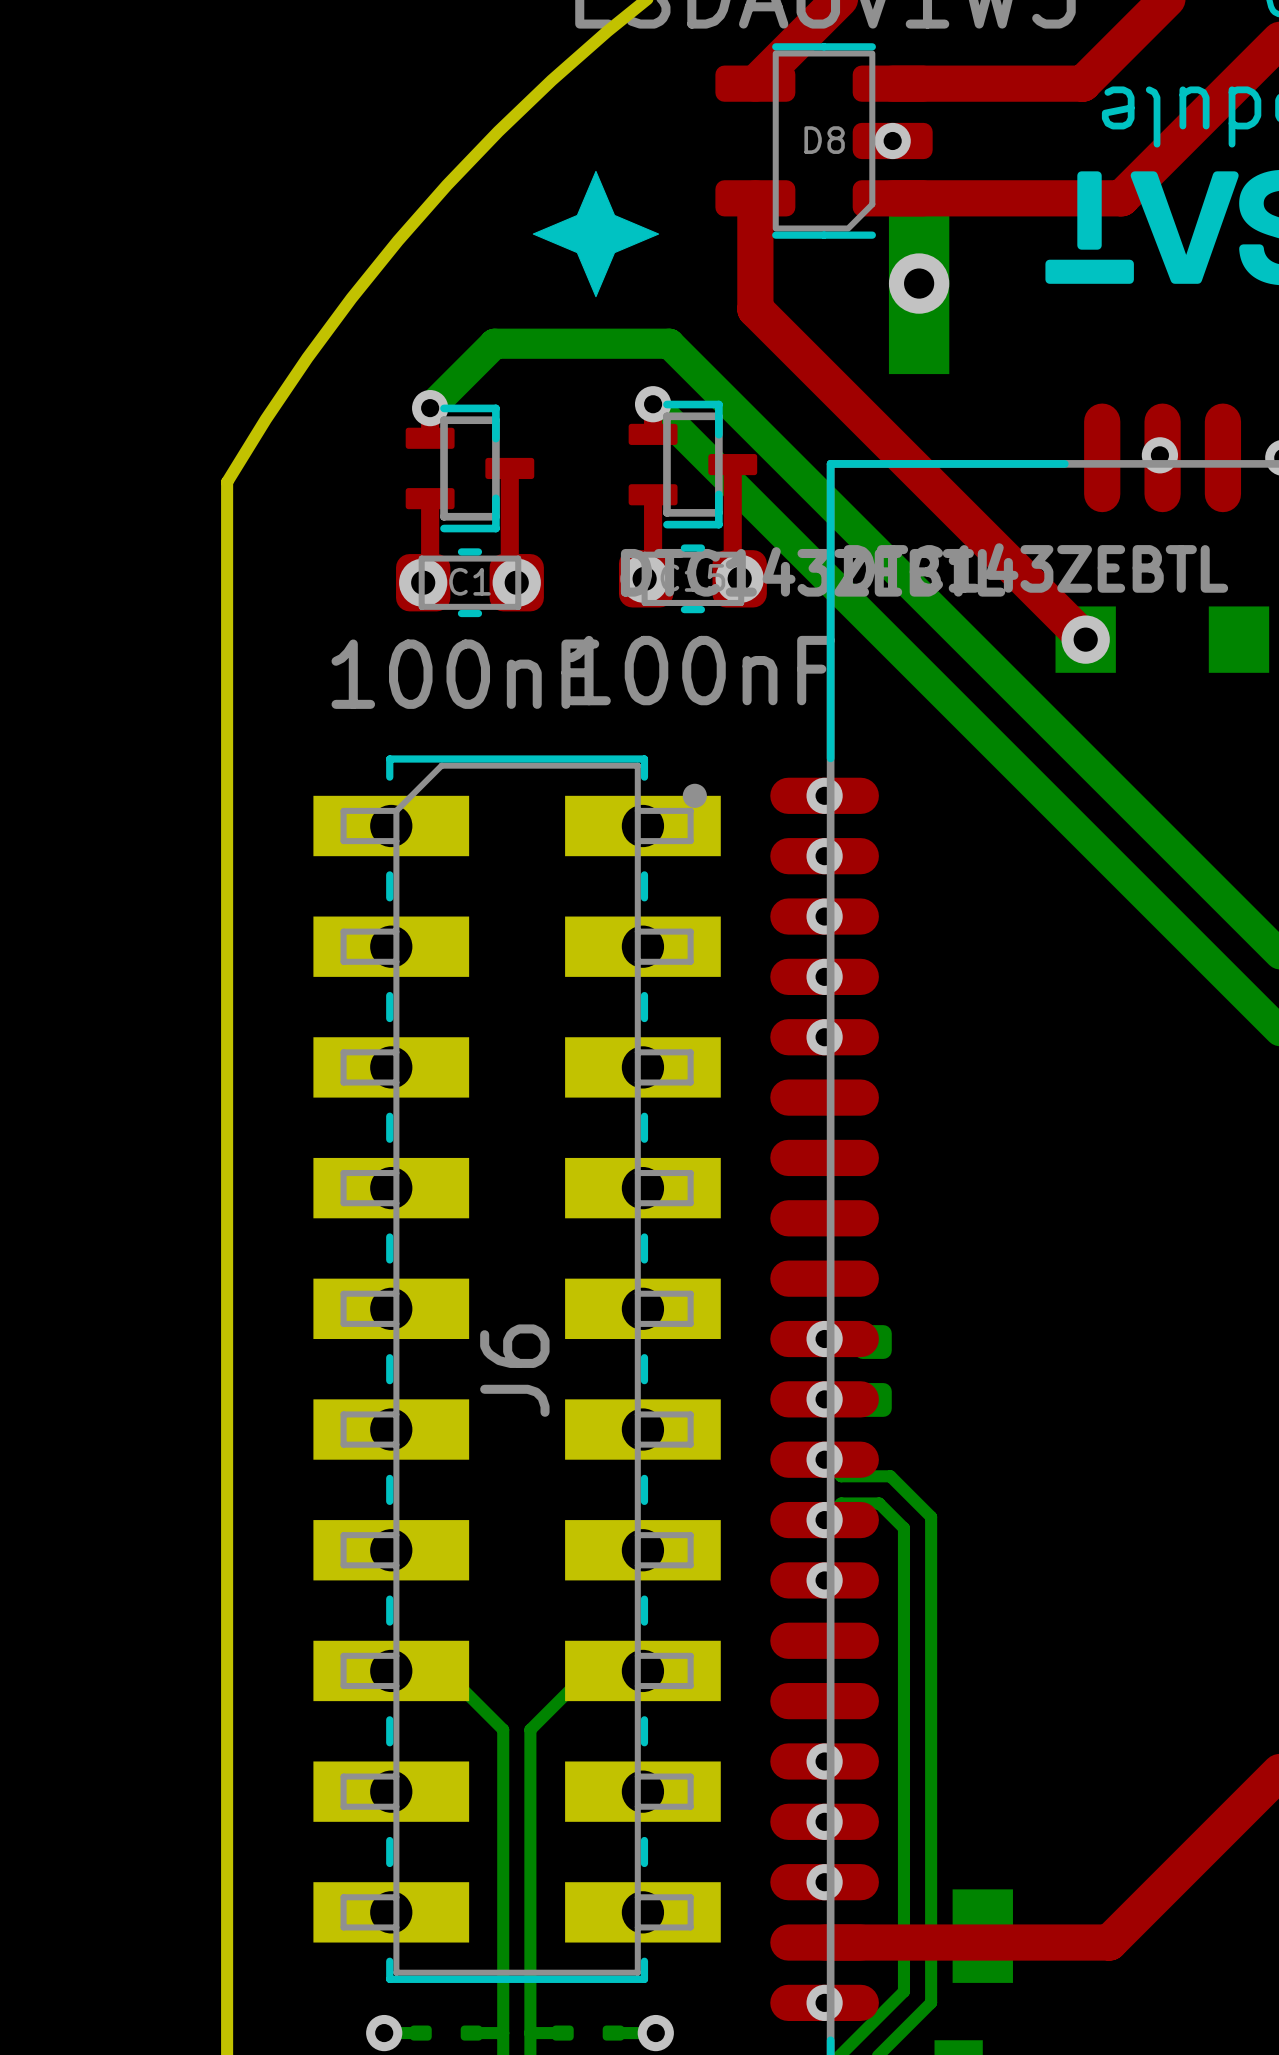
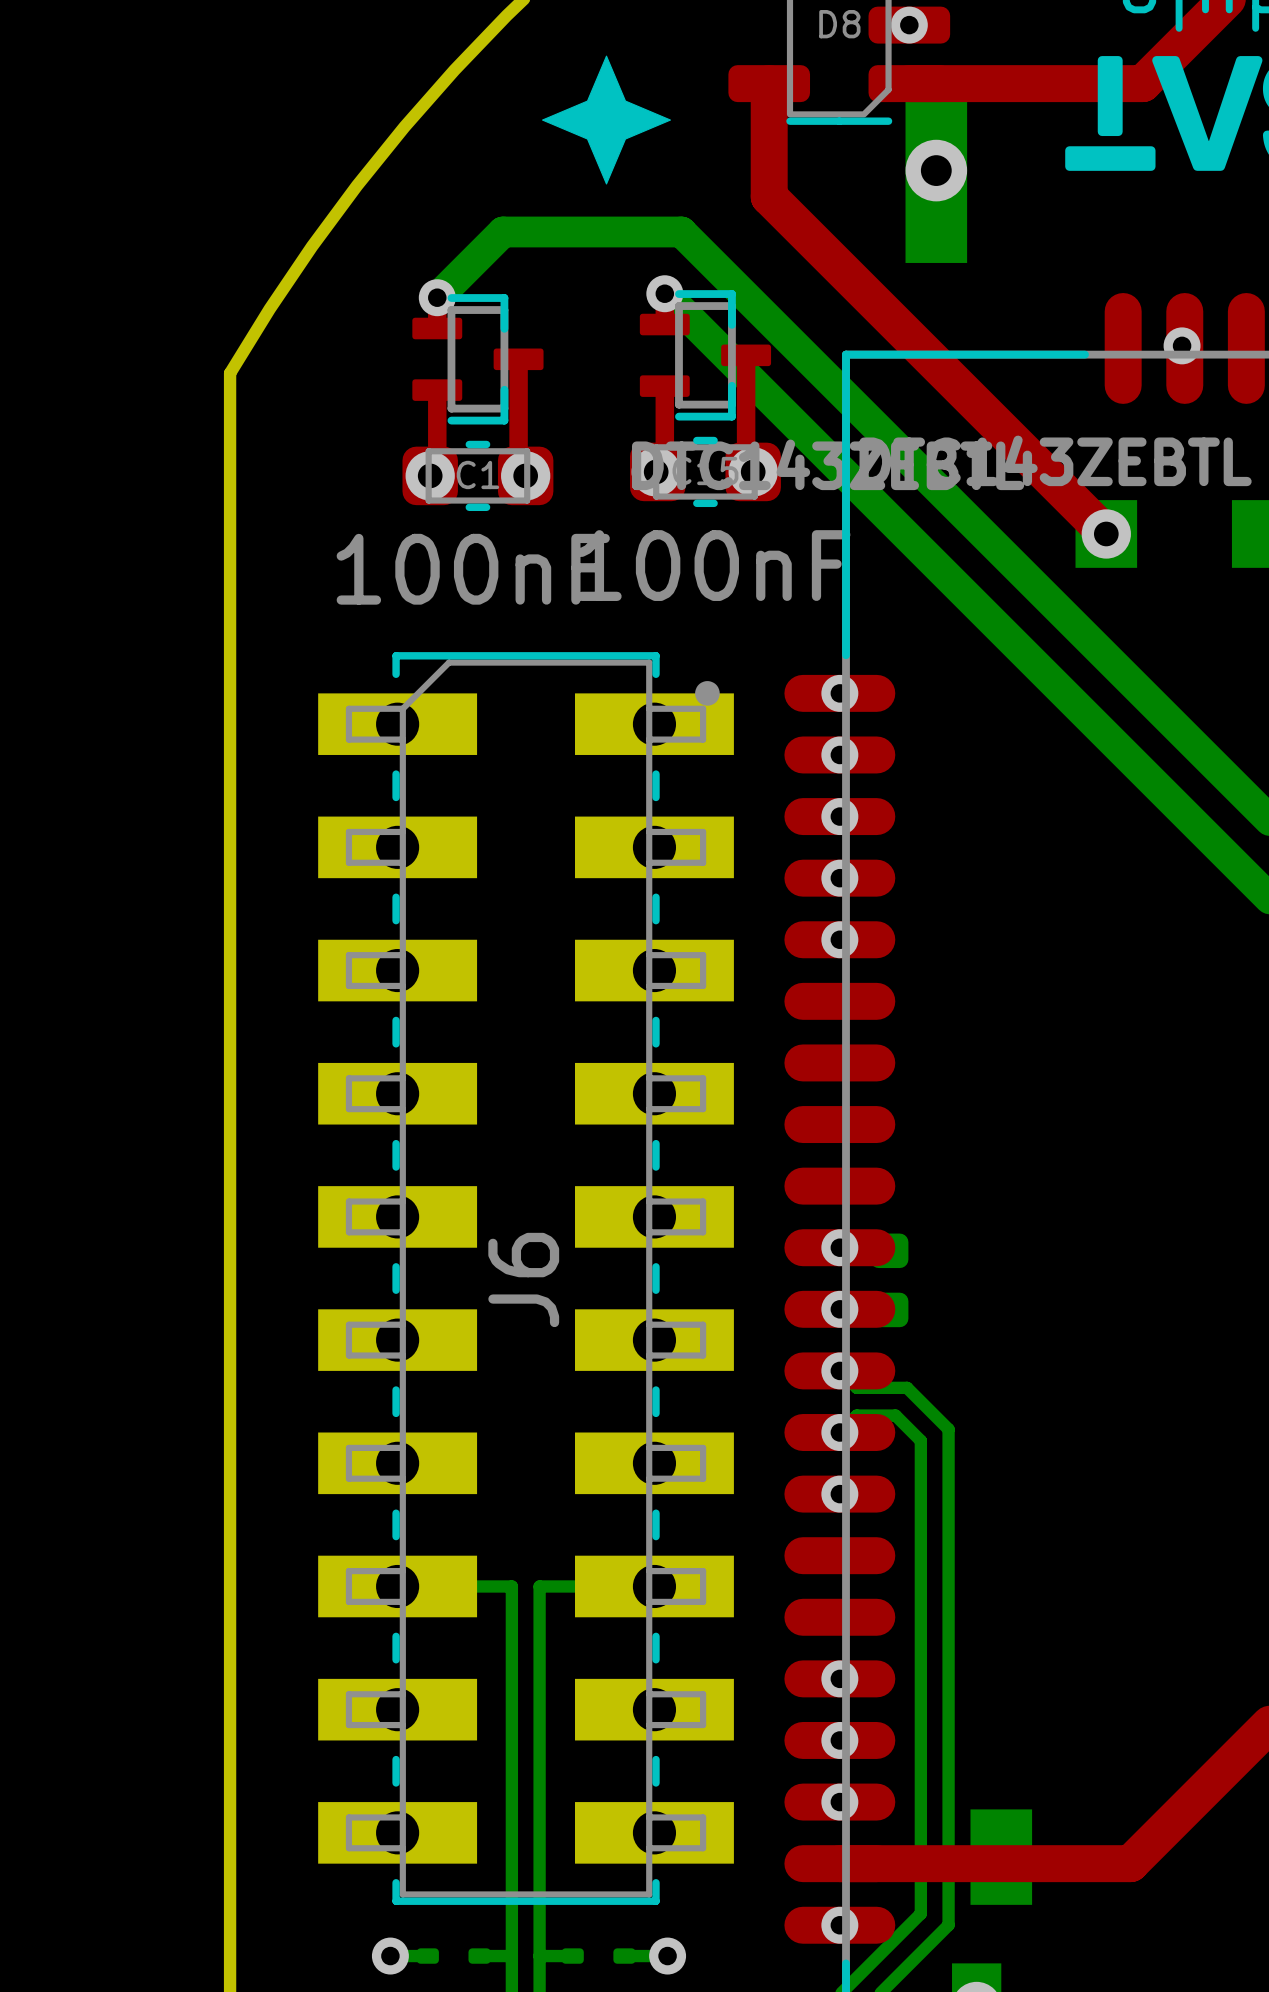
bottom track: (444, 1670) (503, 1729) -> (451, 1586) (511, 1586) (511, 1646)
bottom track: (589, 1670) (530, 1729) -> (599, 1586) (539, 1586) (539, 1646)

